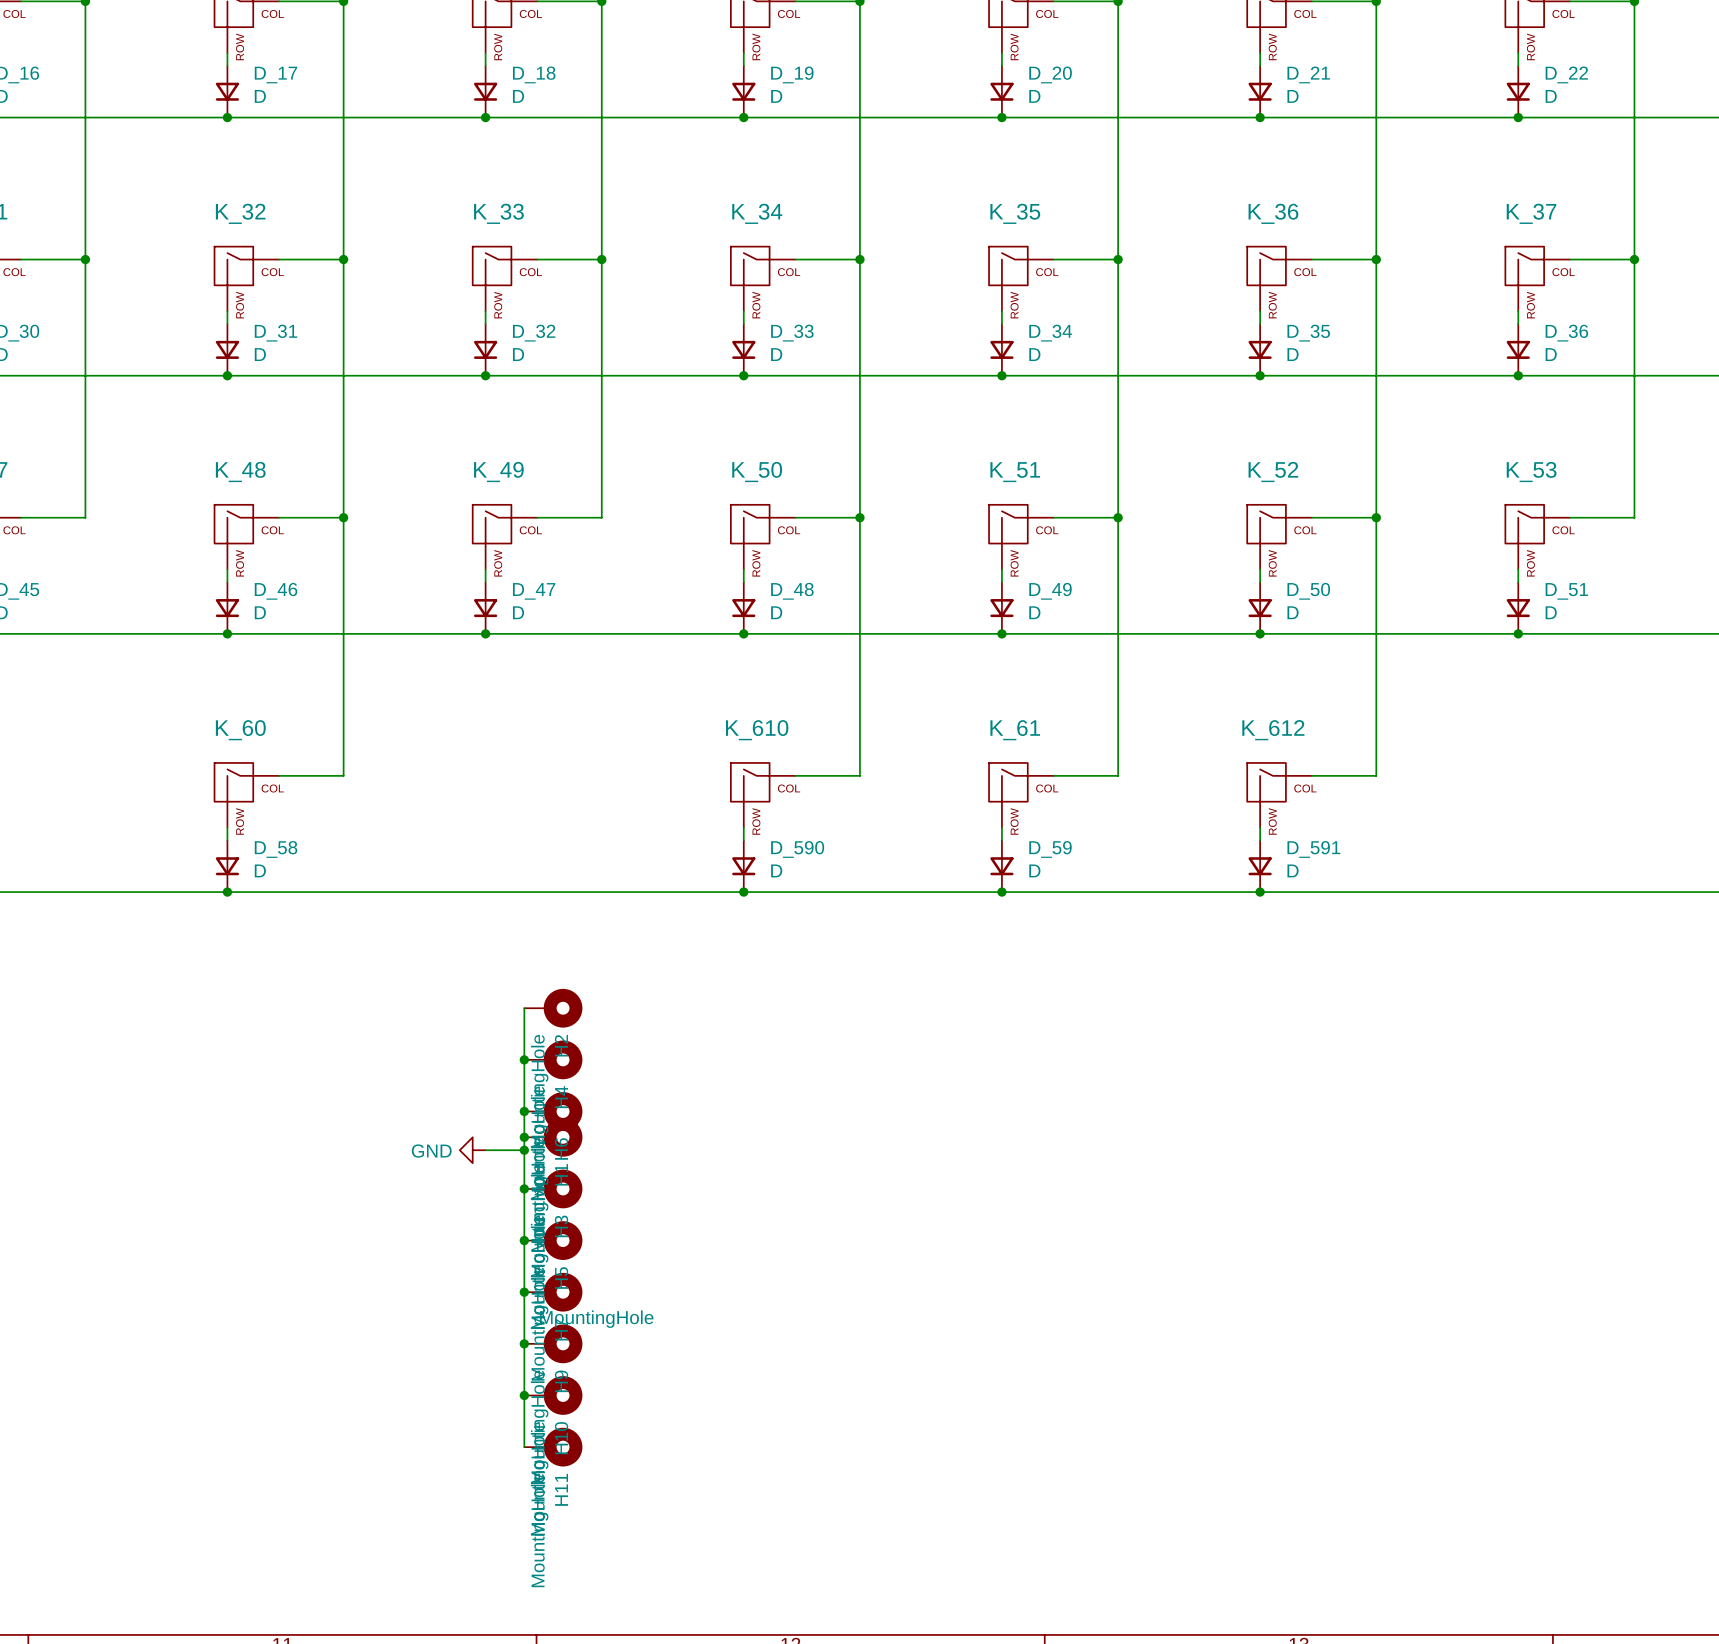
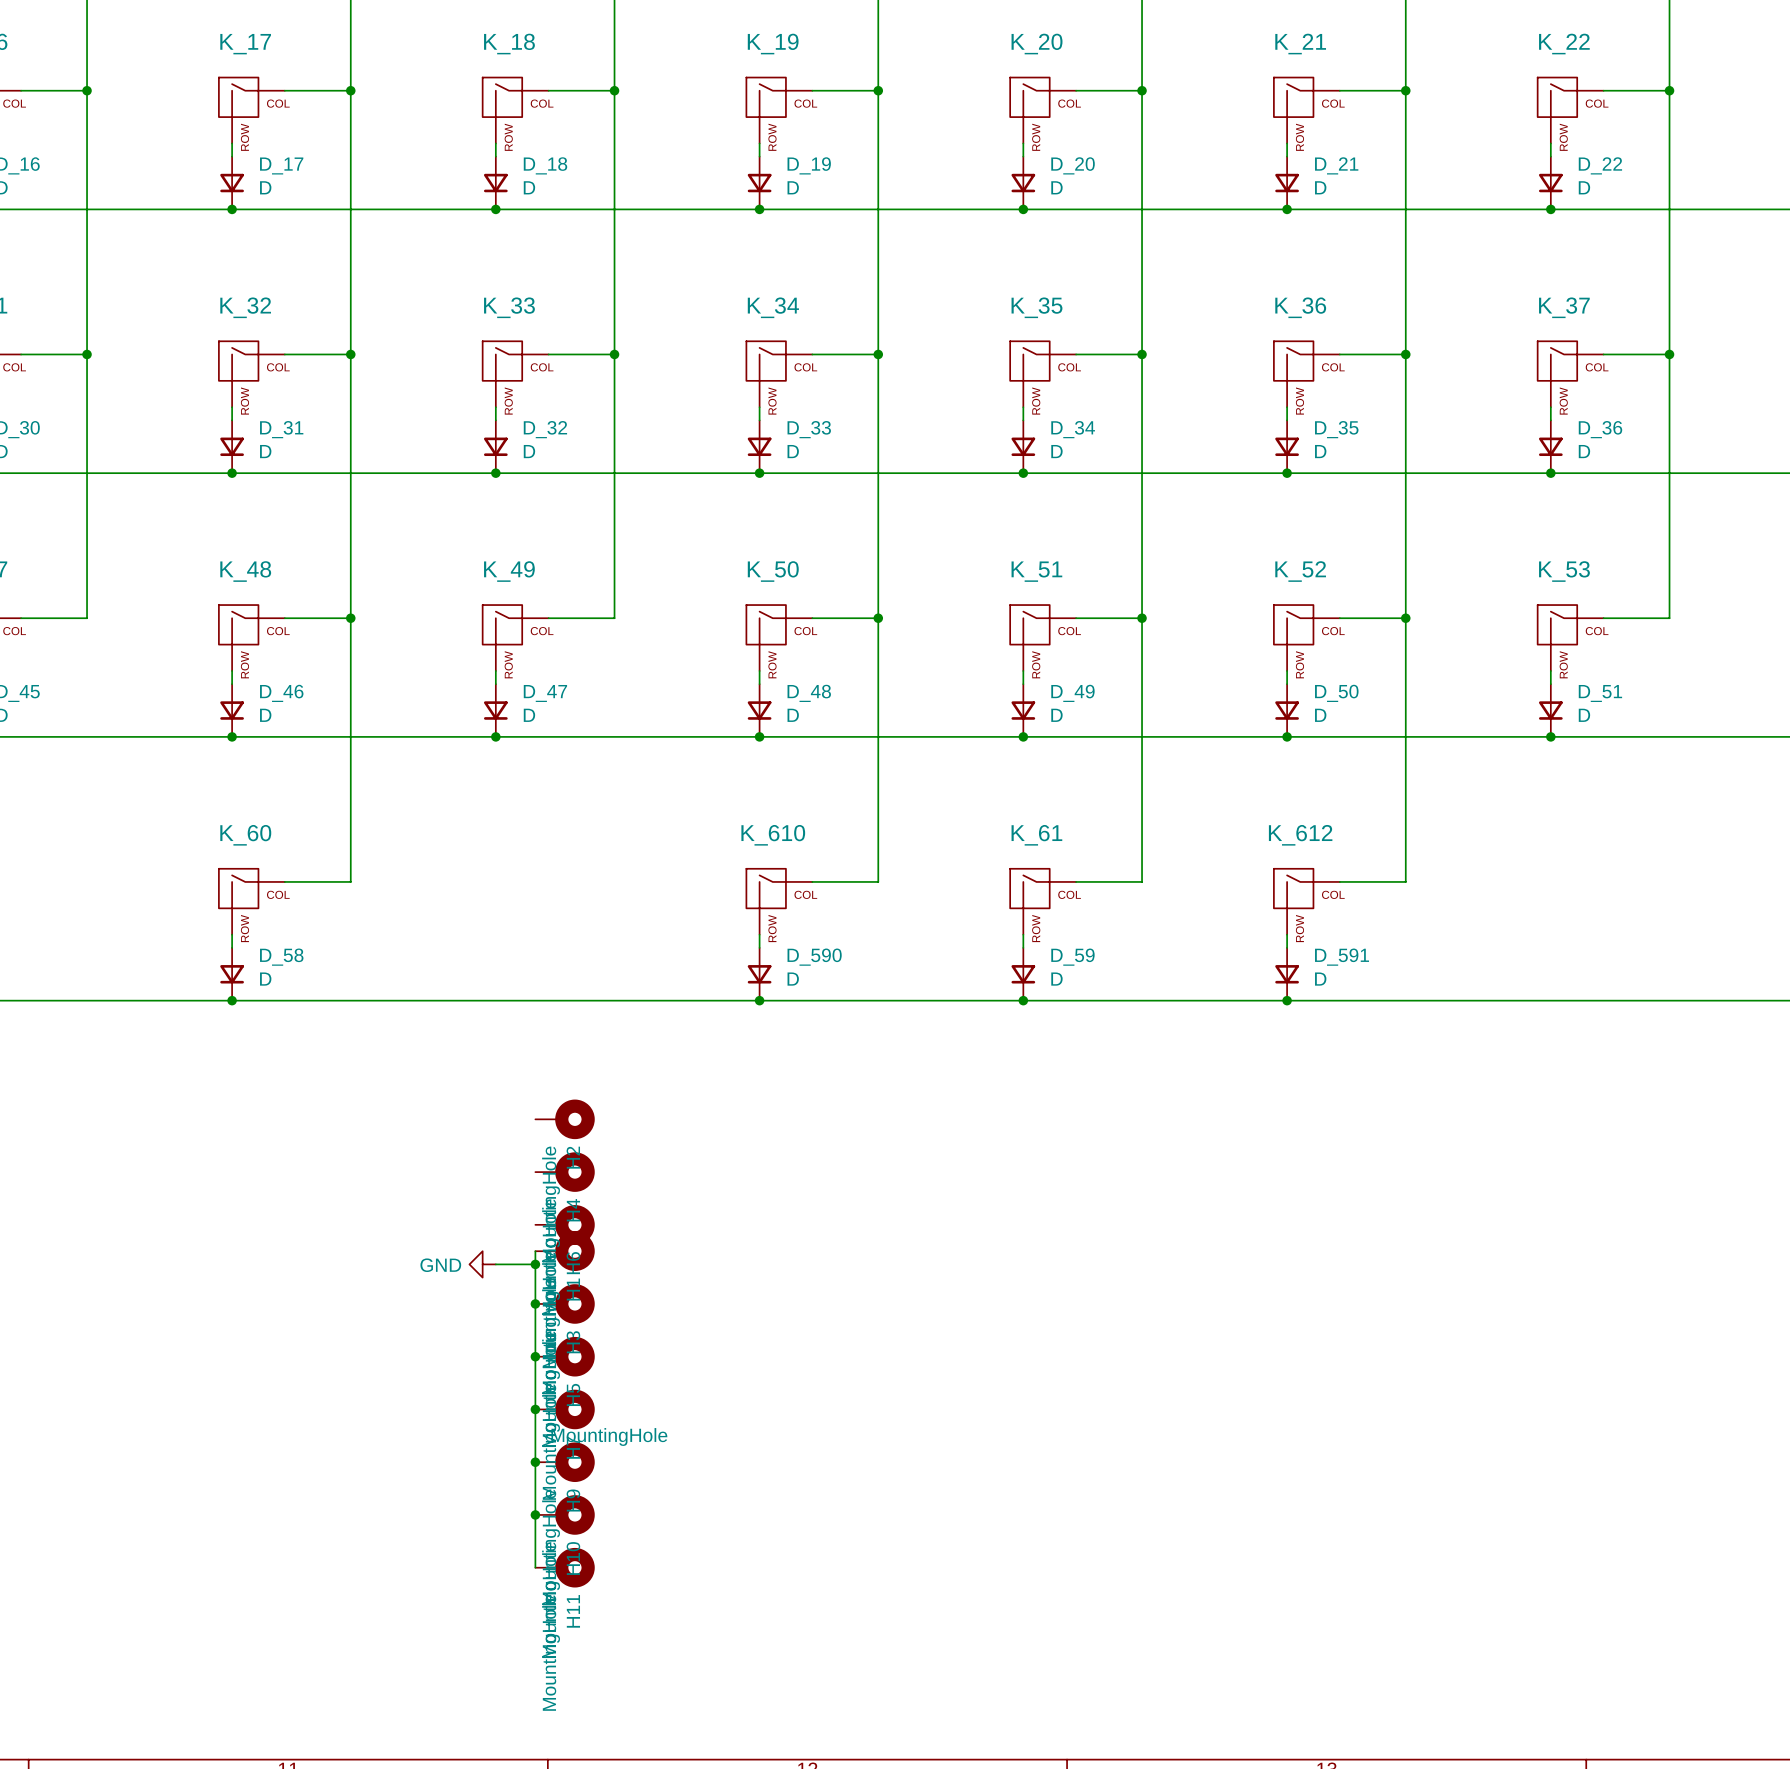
wire: (524, 1008) (524, 1137) -> none
junction: (524, 1059) -> none
junction: (524, 1111) -> none
junction: (524, 1137) -> none

